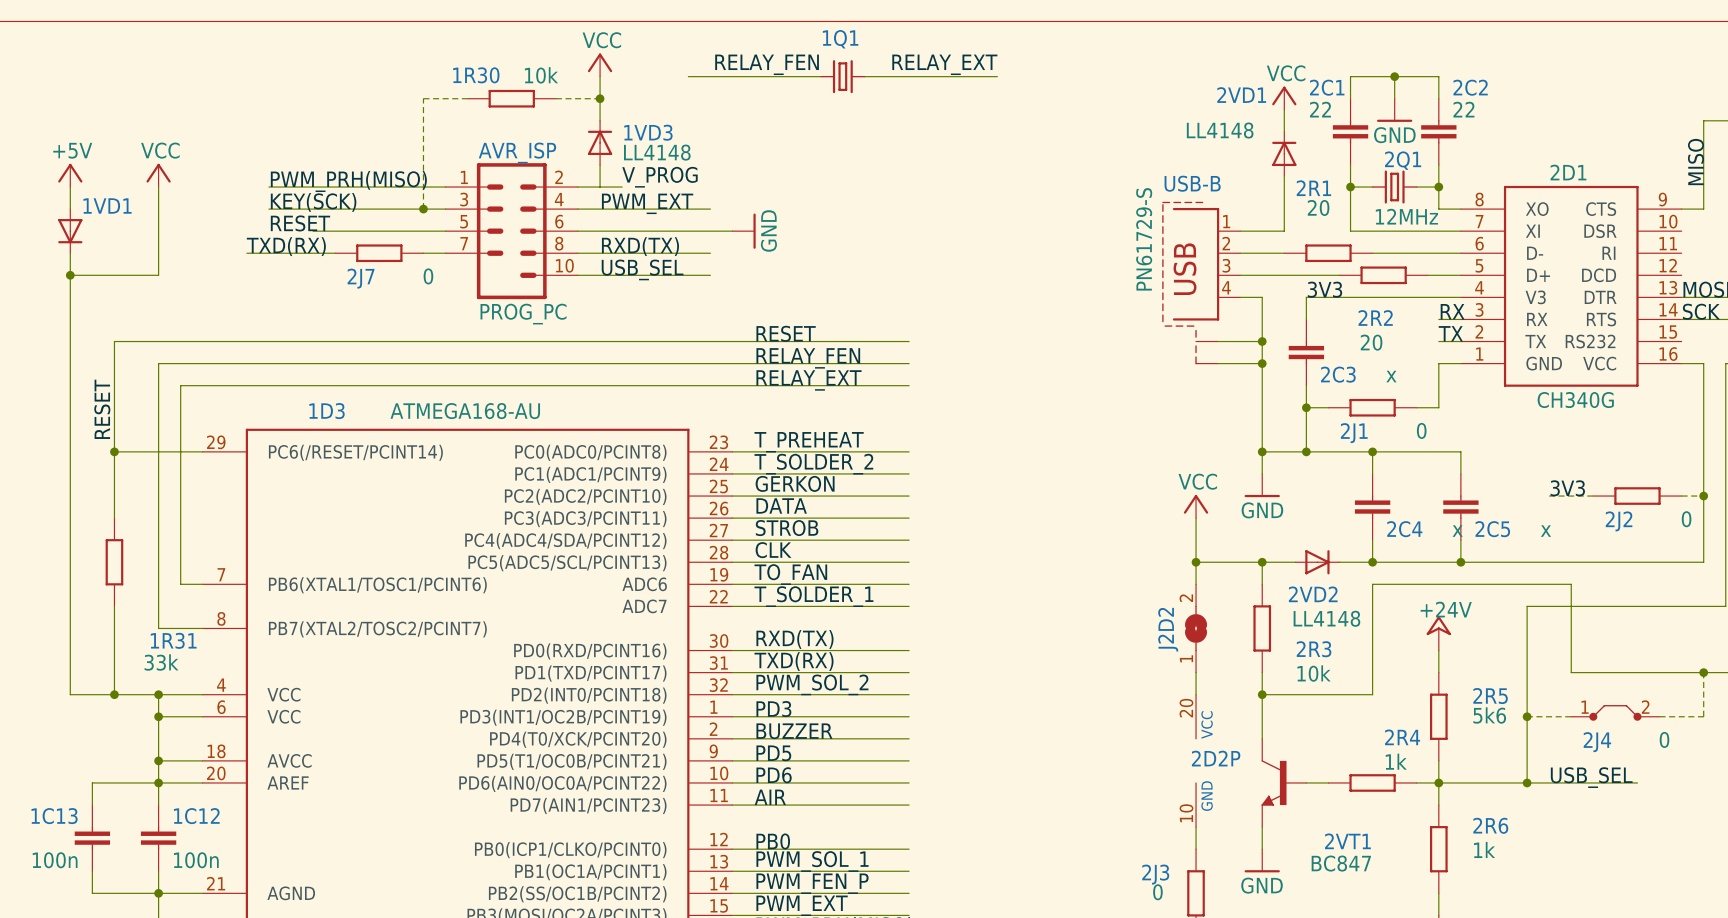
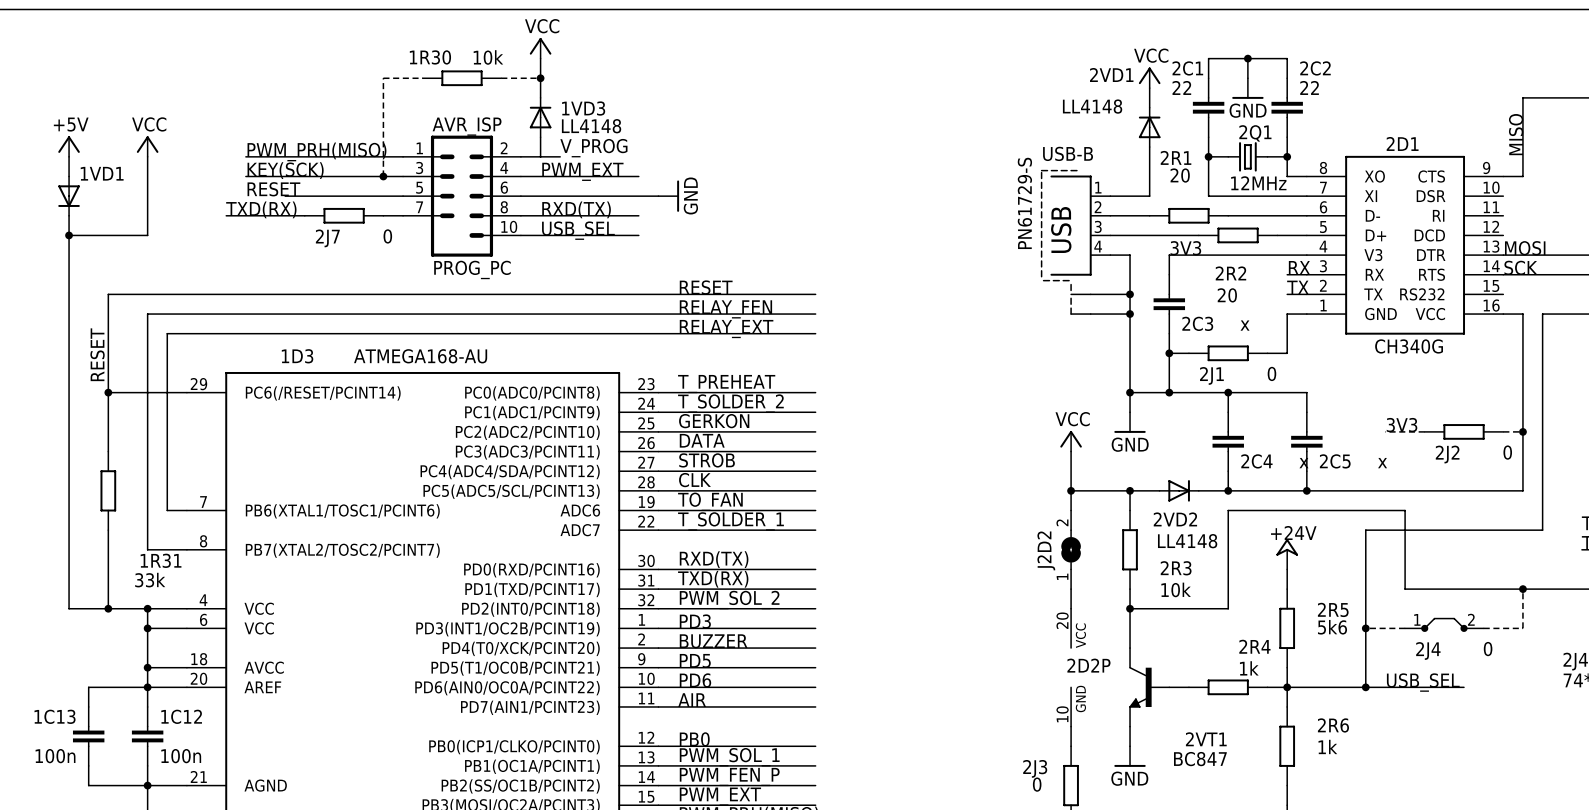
label: RELAY_FEN (767, 64) -> none
label: RELAY_EXT (944, 64) -> none
wire: (688, 76) (820, 76) -> none
1Q1: (842, 76) -> none
wire: (864, 76) (997, 76) -> none

